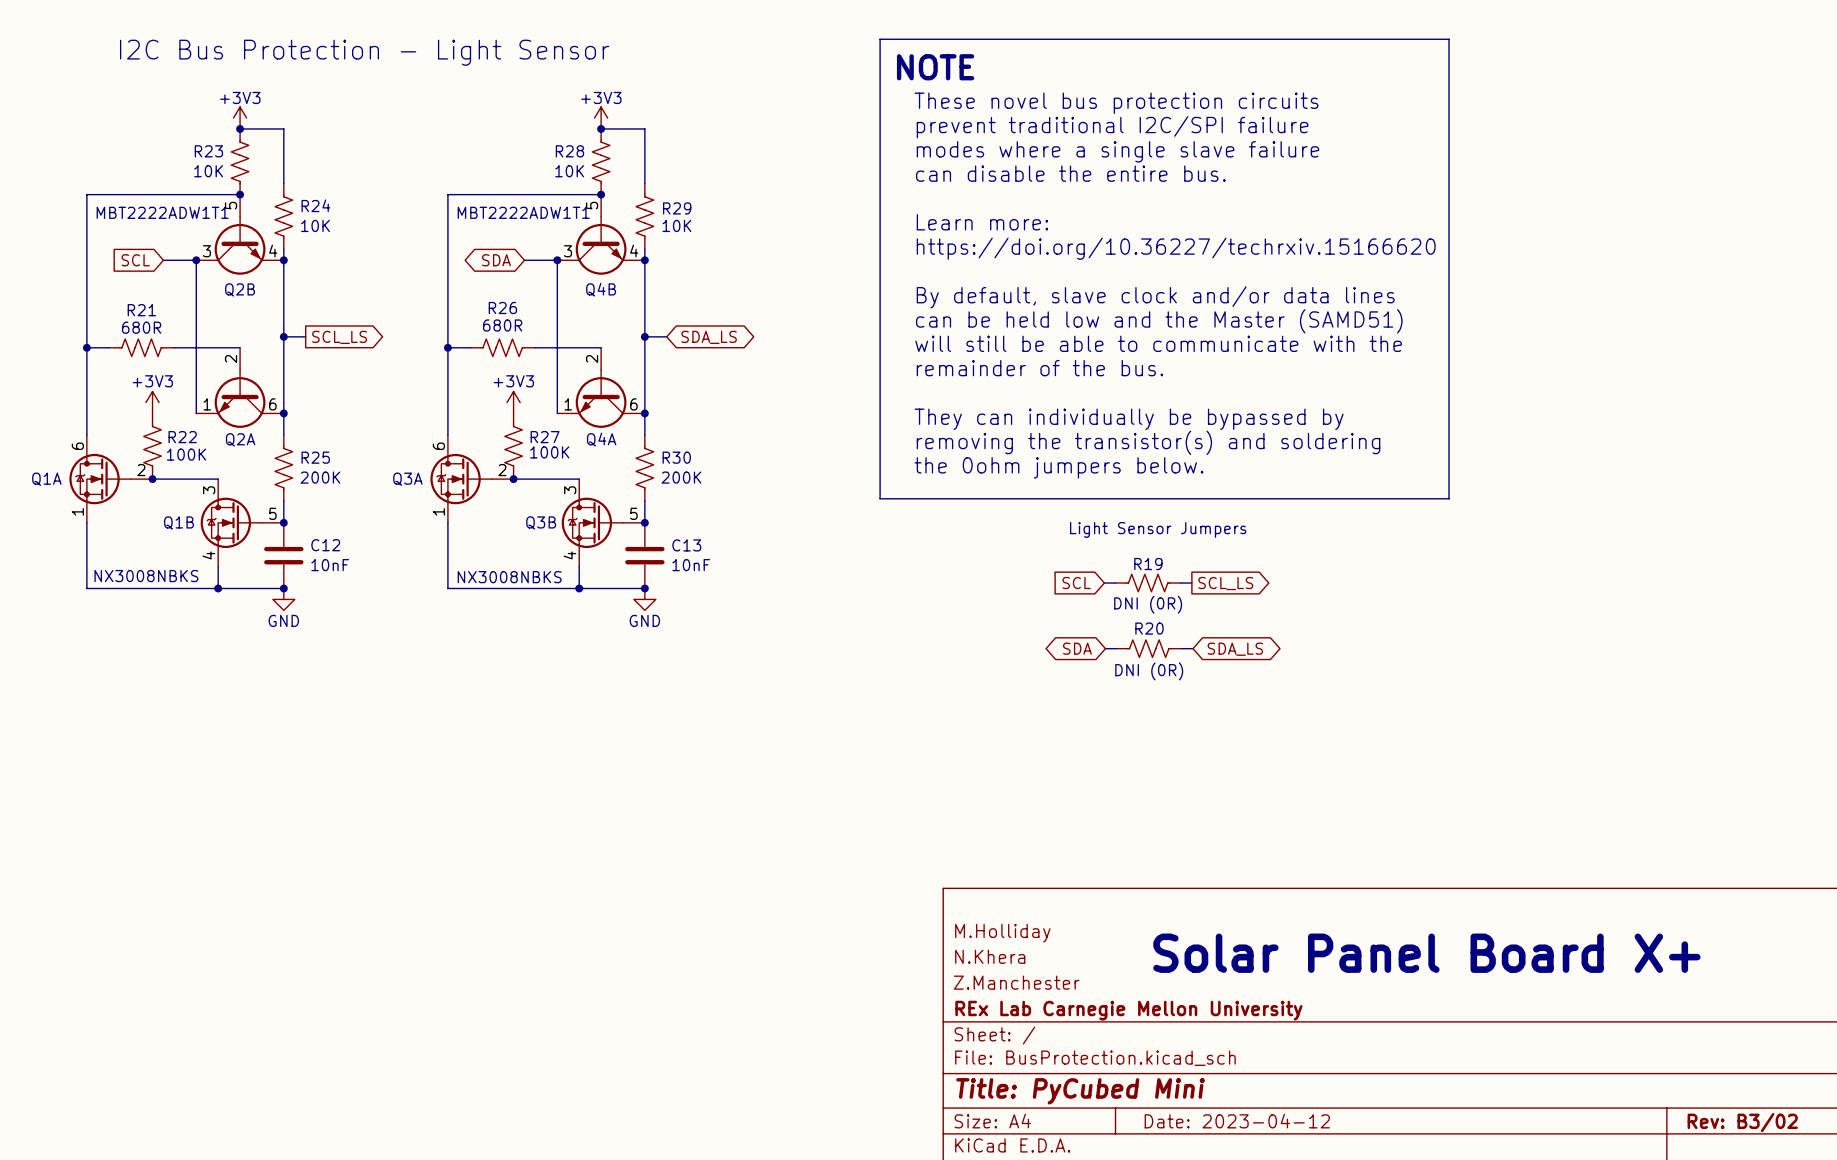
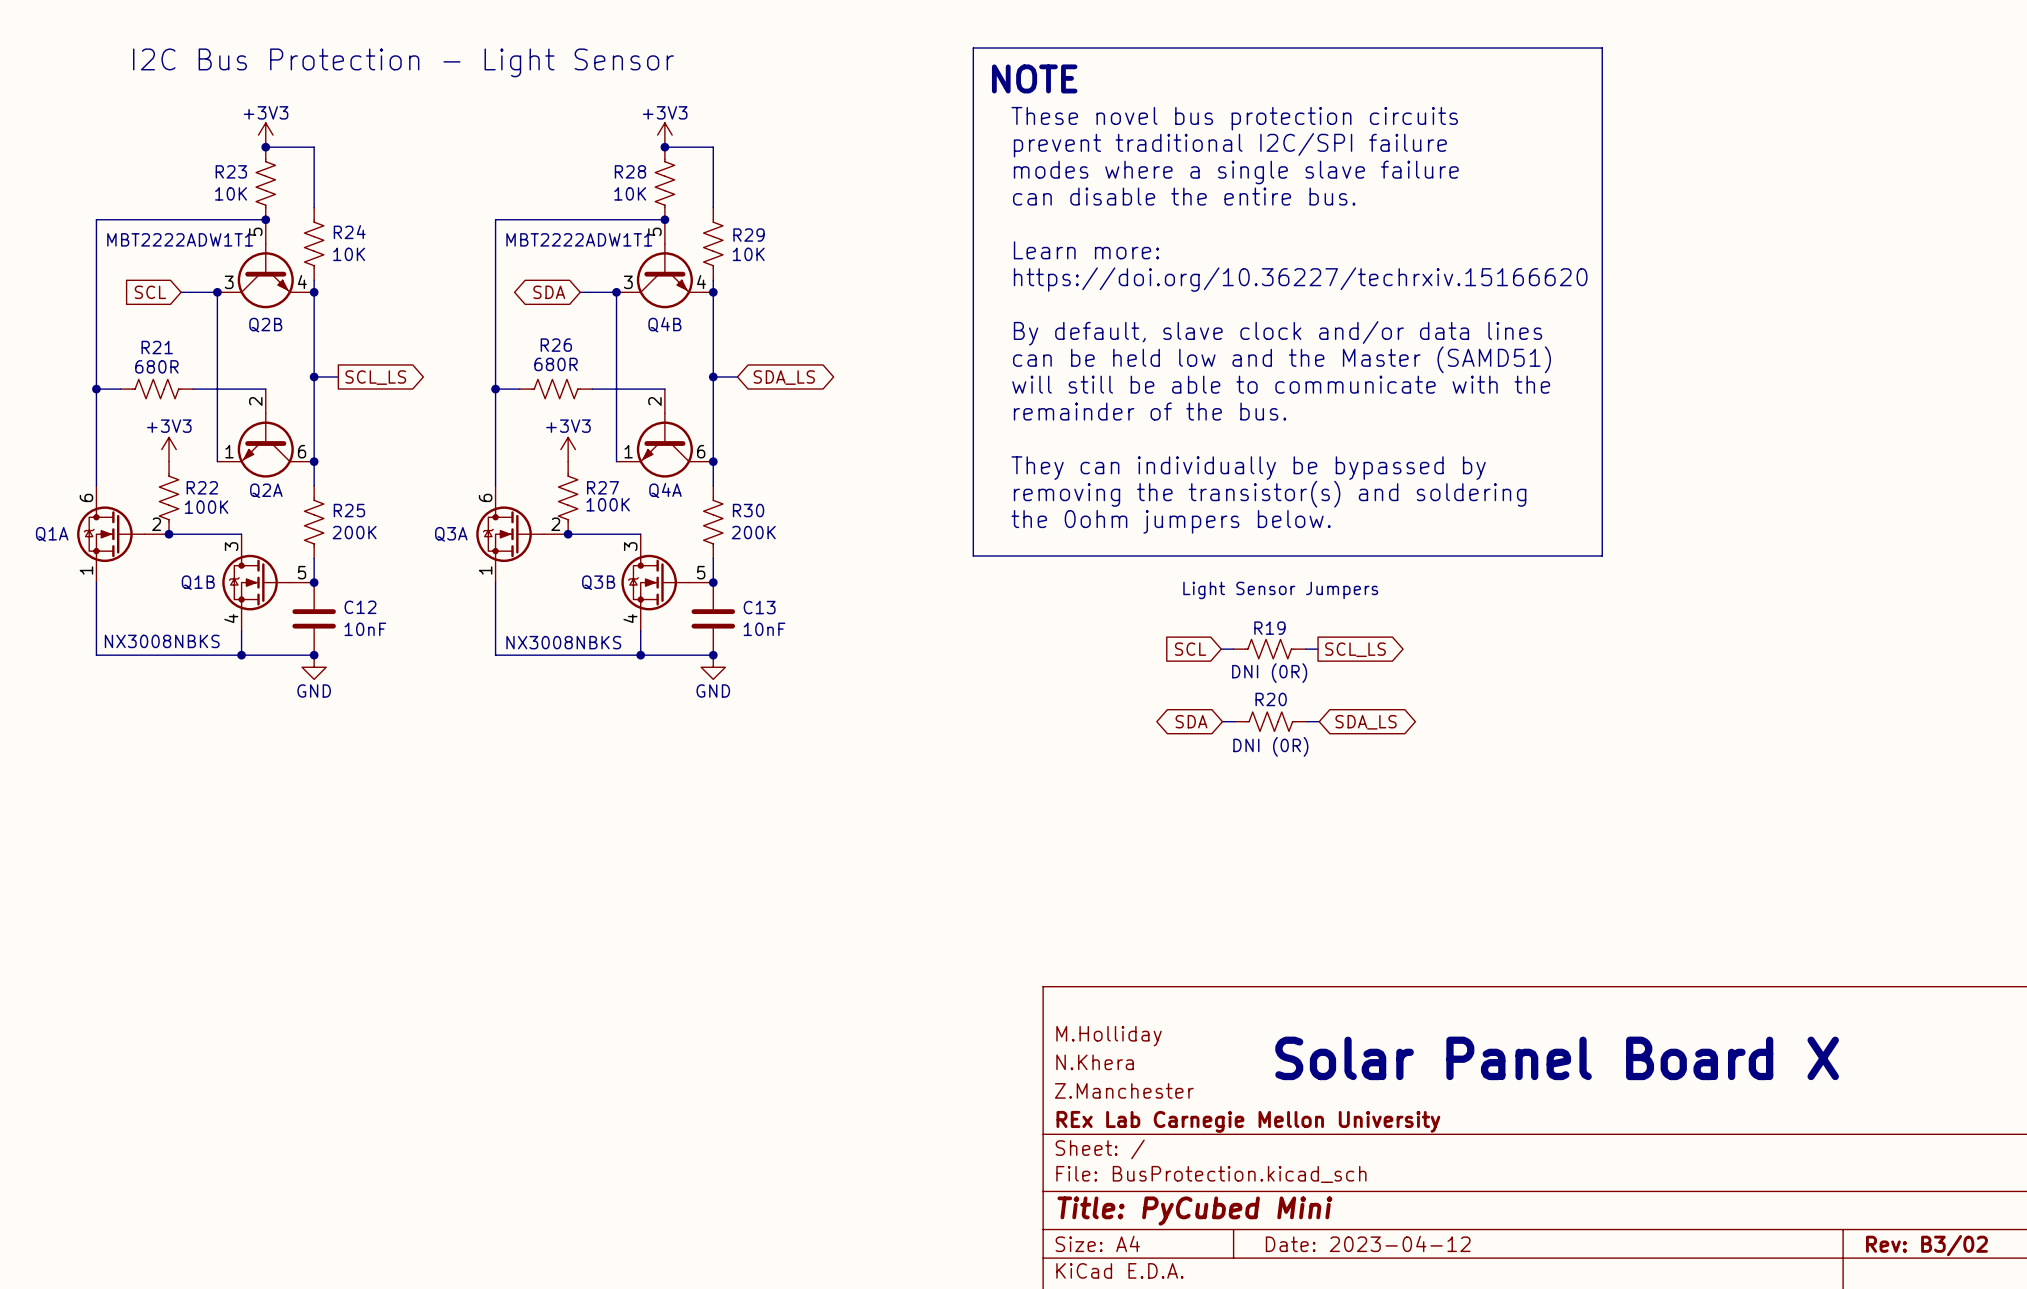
text: Solar Panel Board X+ (1426, 953) -> Solar Panel Board X (1557, 1058)

